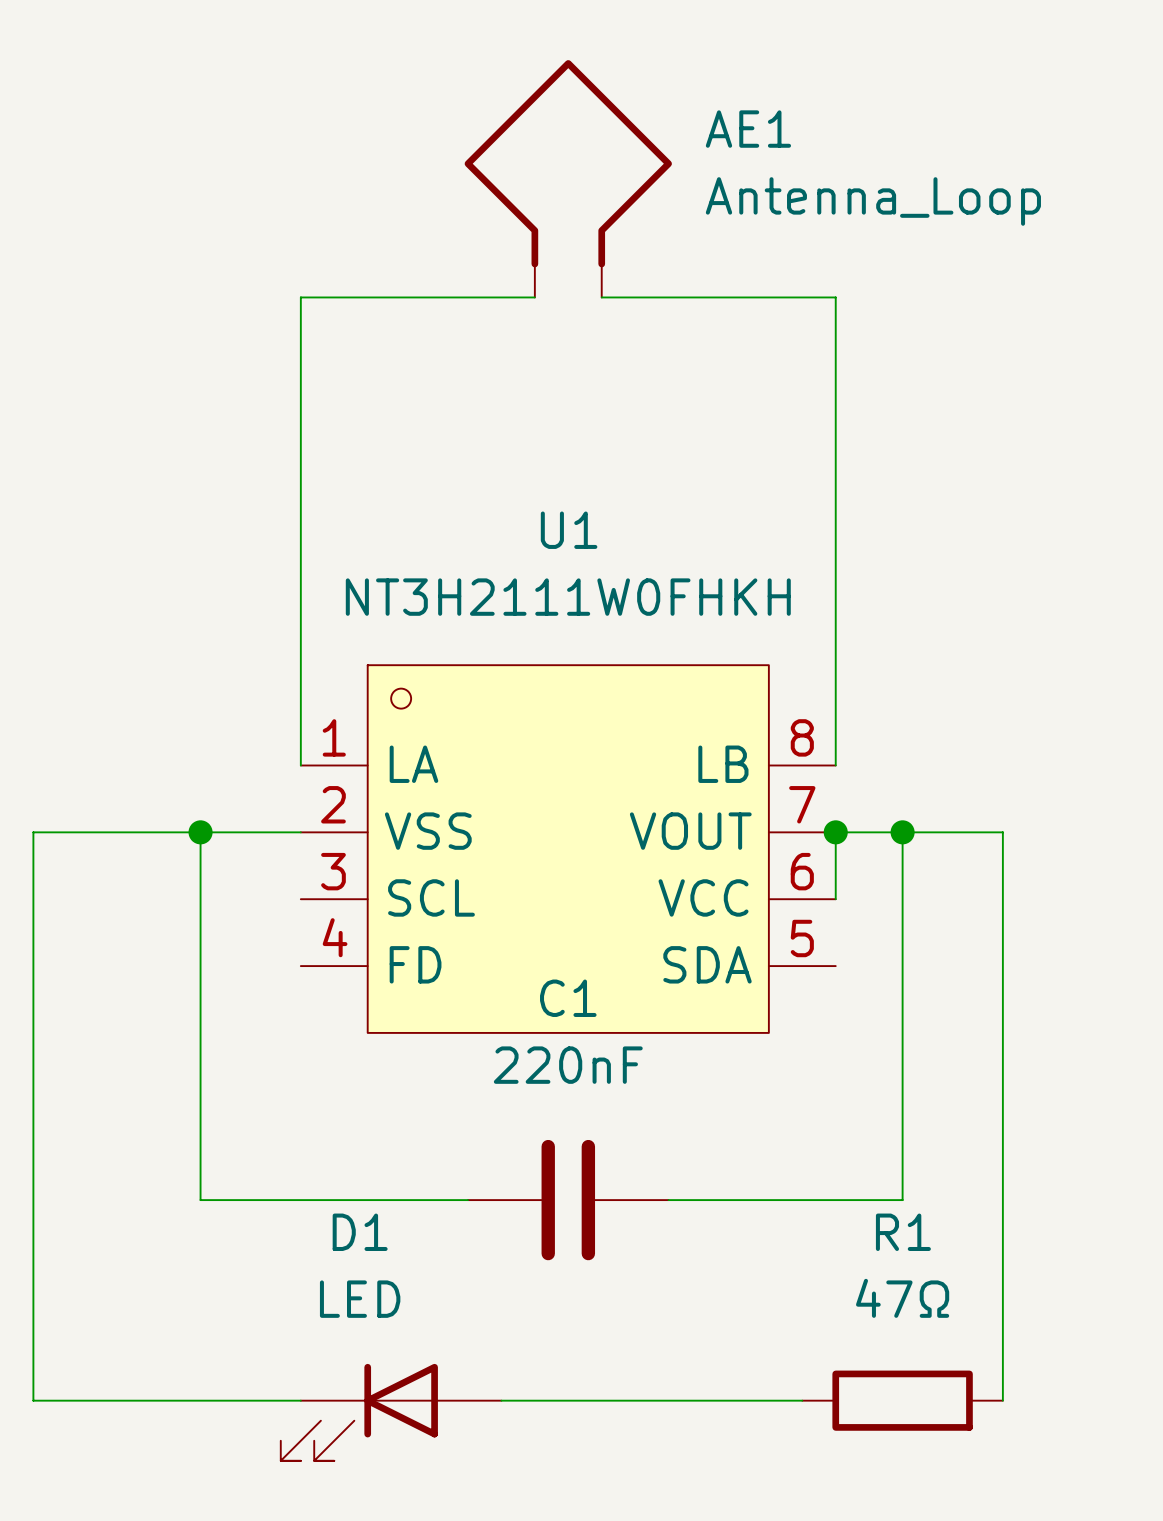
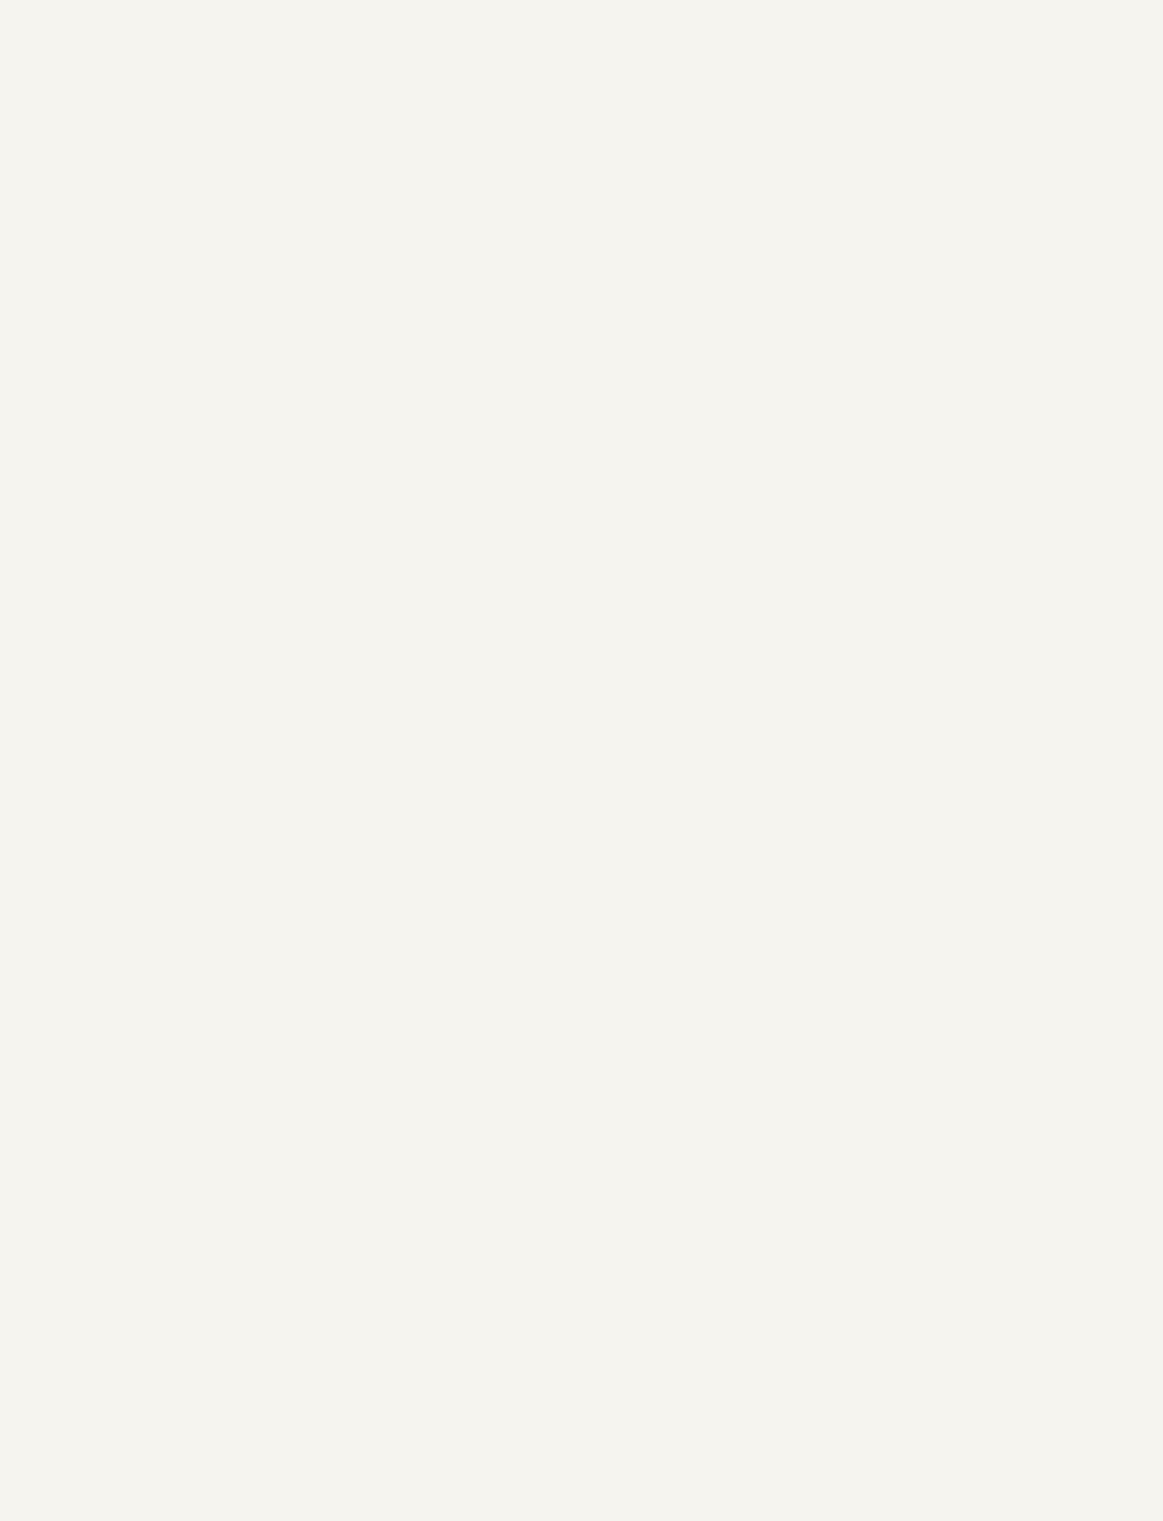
AE1: Antenna_Loop (568, 178) -> none
wire: (534, 297) (300, 297) (300, 765) -> none
wire: (601, 297) (835, 297) (835, 765) -> none
wire: (200, 832) (200, 1200) (468, 1200) -> none
junction: (200, 832) -> none
wire: (300, 832) (33, 832) (33, 1400) (300, 1400) -> none
junction: (835, 832) -> none
wire: (902, 832) (902, 1200) (668, 1200) -> none
junction: (902, 832) -> none
U1: NT3H2111W0FHKH (568, 849) -> none
wire: (835, 899) (835, 832) (1002, 832) (1002, 1400) -> none
C1: 220nF (568, 1200) -> none
wire: (501, 1400) (802, 1400) -> none
R1: 47Ω (902, 1400) -> none
D1: LED (391, 1412) -> none

